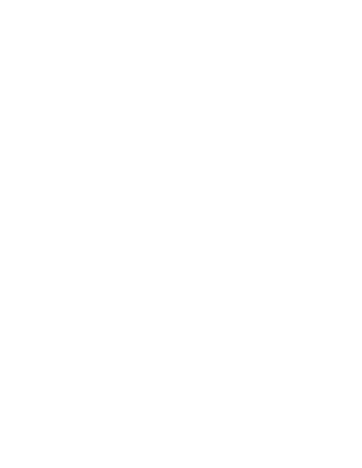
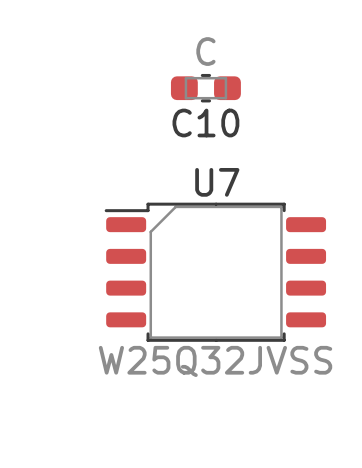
C10: none -> C (205, 88)
U7: none -> W25Q32JVSS (215, 272)

